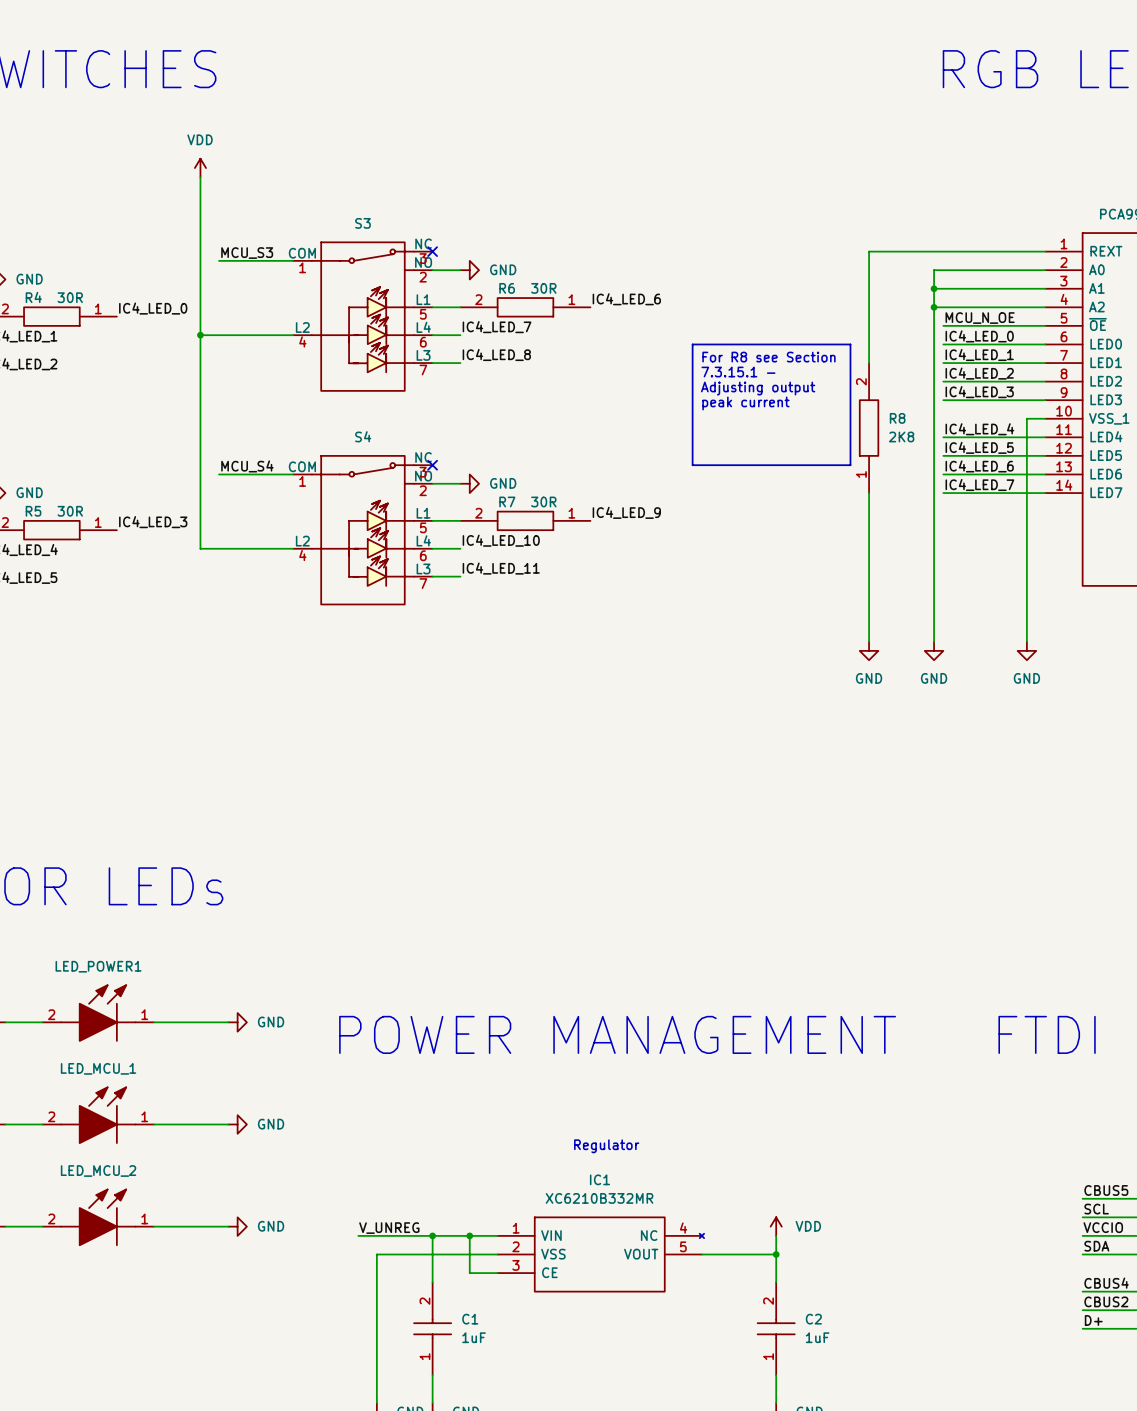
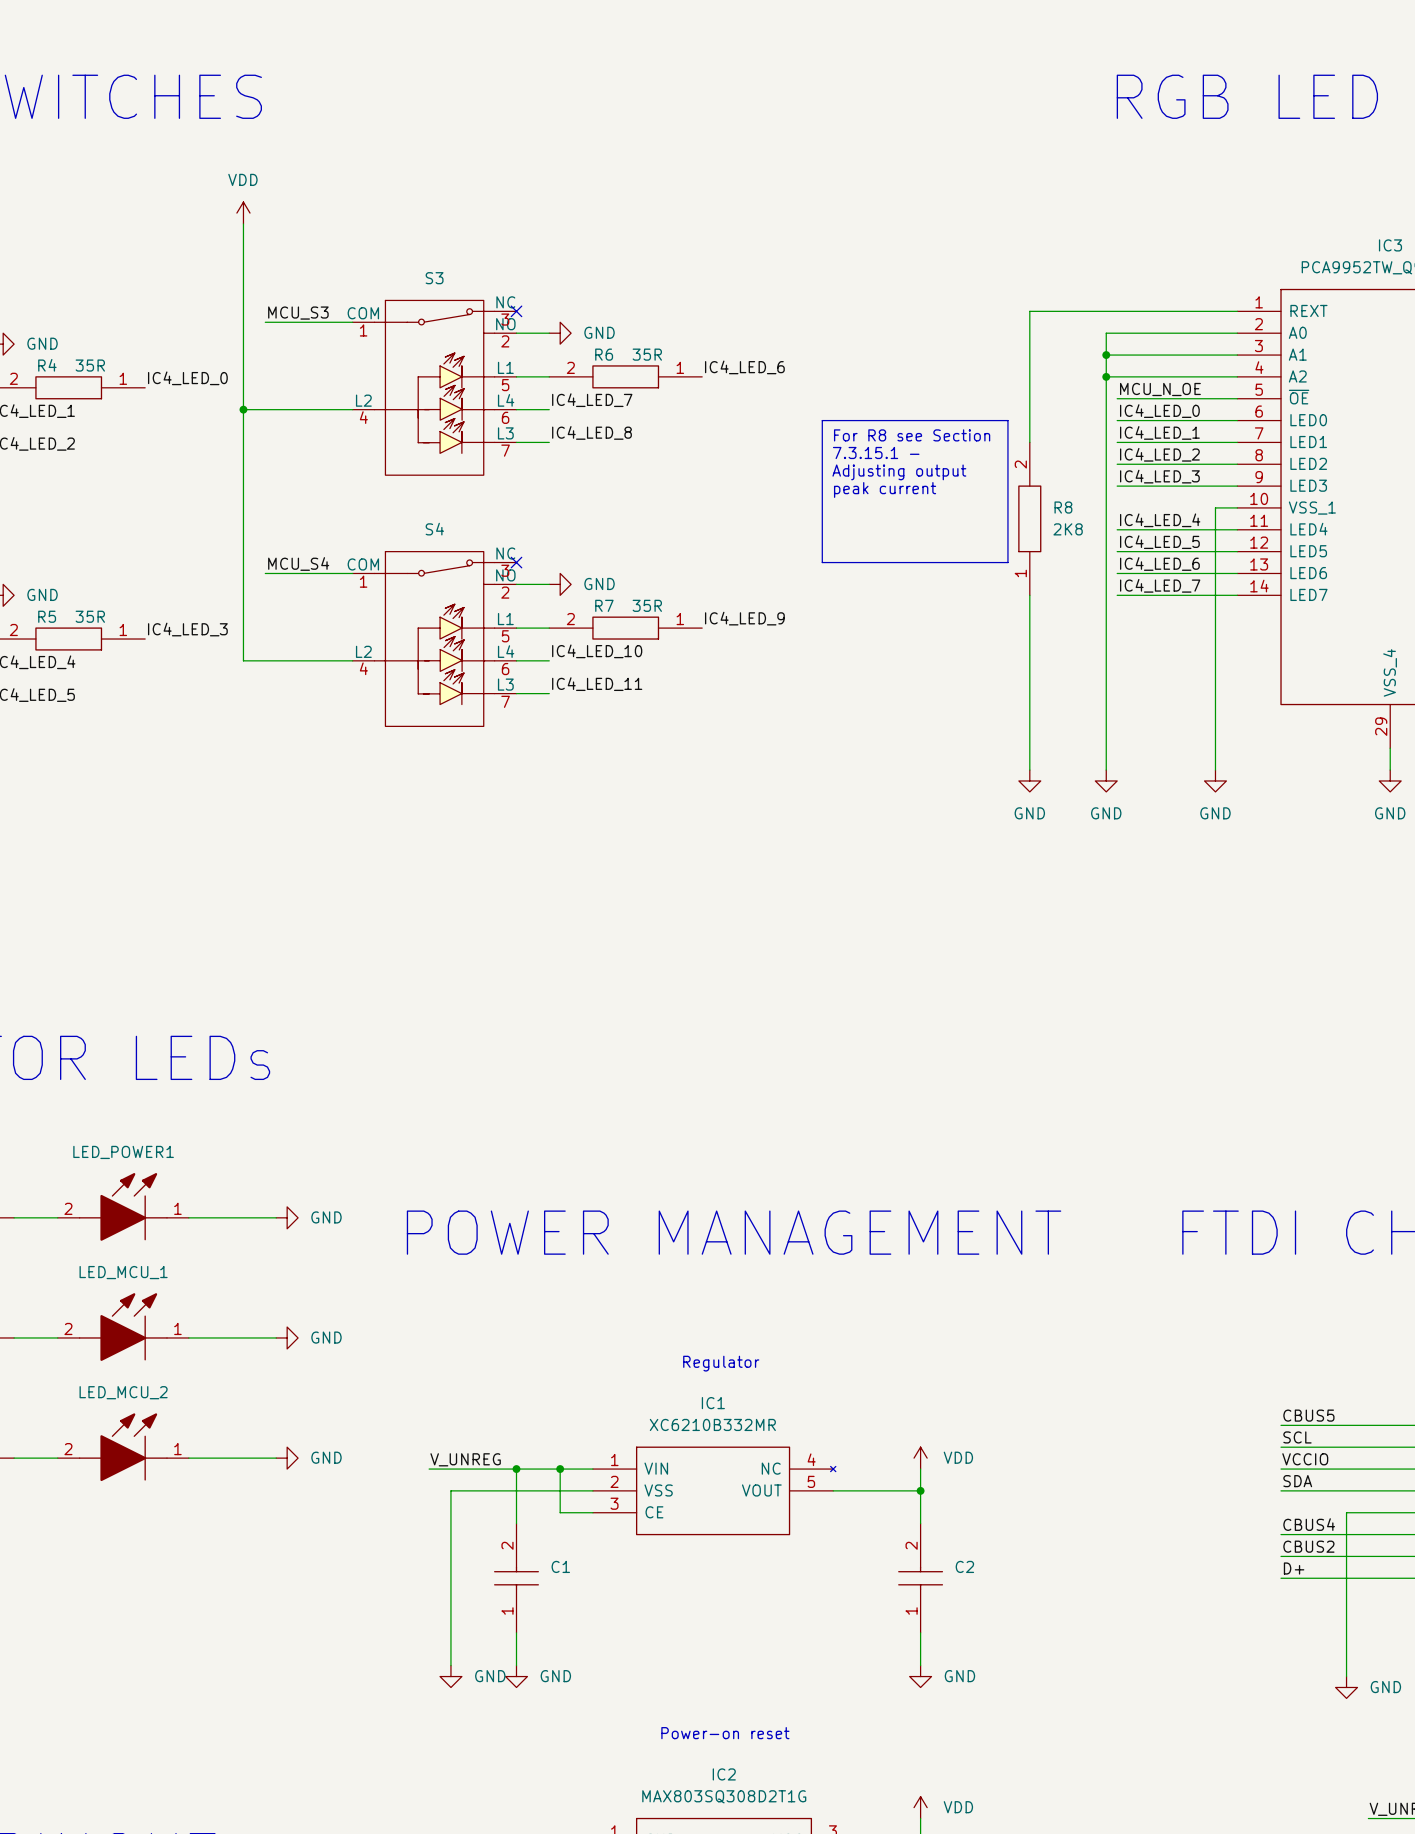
R6 value: 30R (543, 288) -> 35R (647, 354)
R4 value: 30R (70, 297) -> 35R (90, 365)
R7 value: 30R (543, 501) -> 35R (647, 605)
R5 value: 30R (70, 511) -> 35R (90, 616)
C1 value: 1uF (474, 1337) -> none
C2 value: 1uF (817, 1337) -> none

